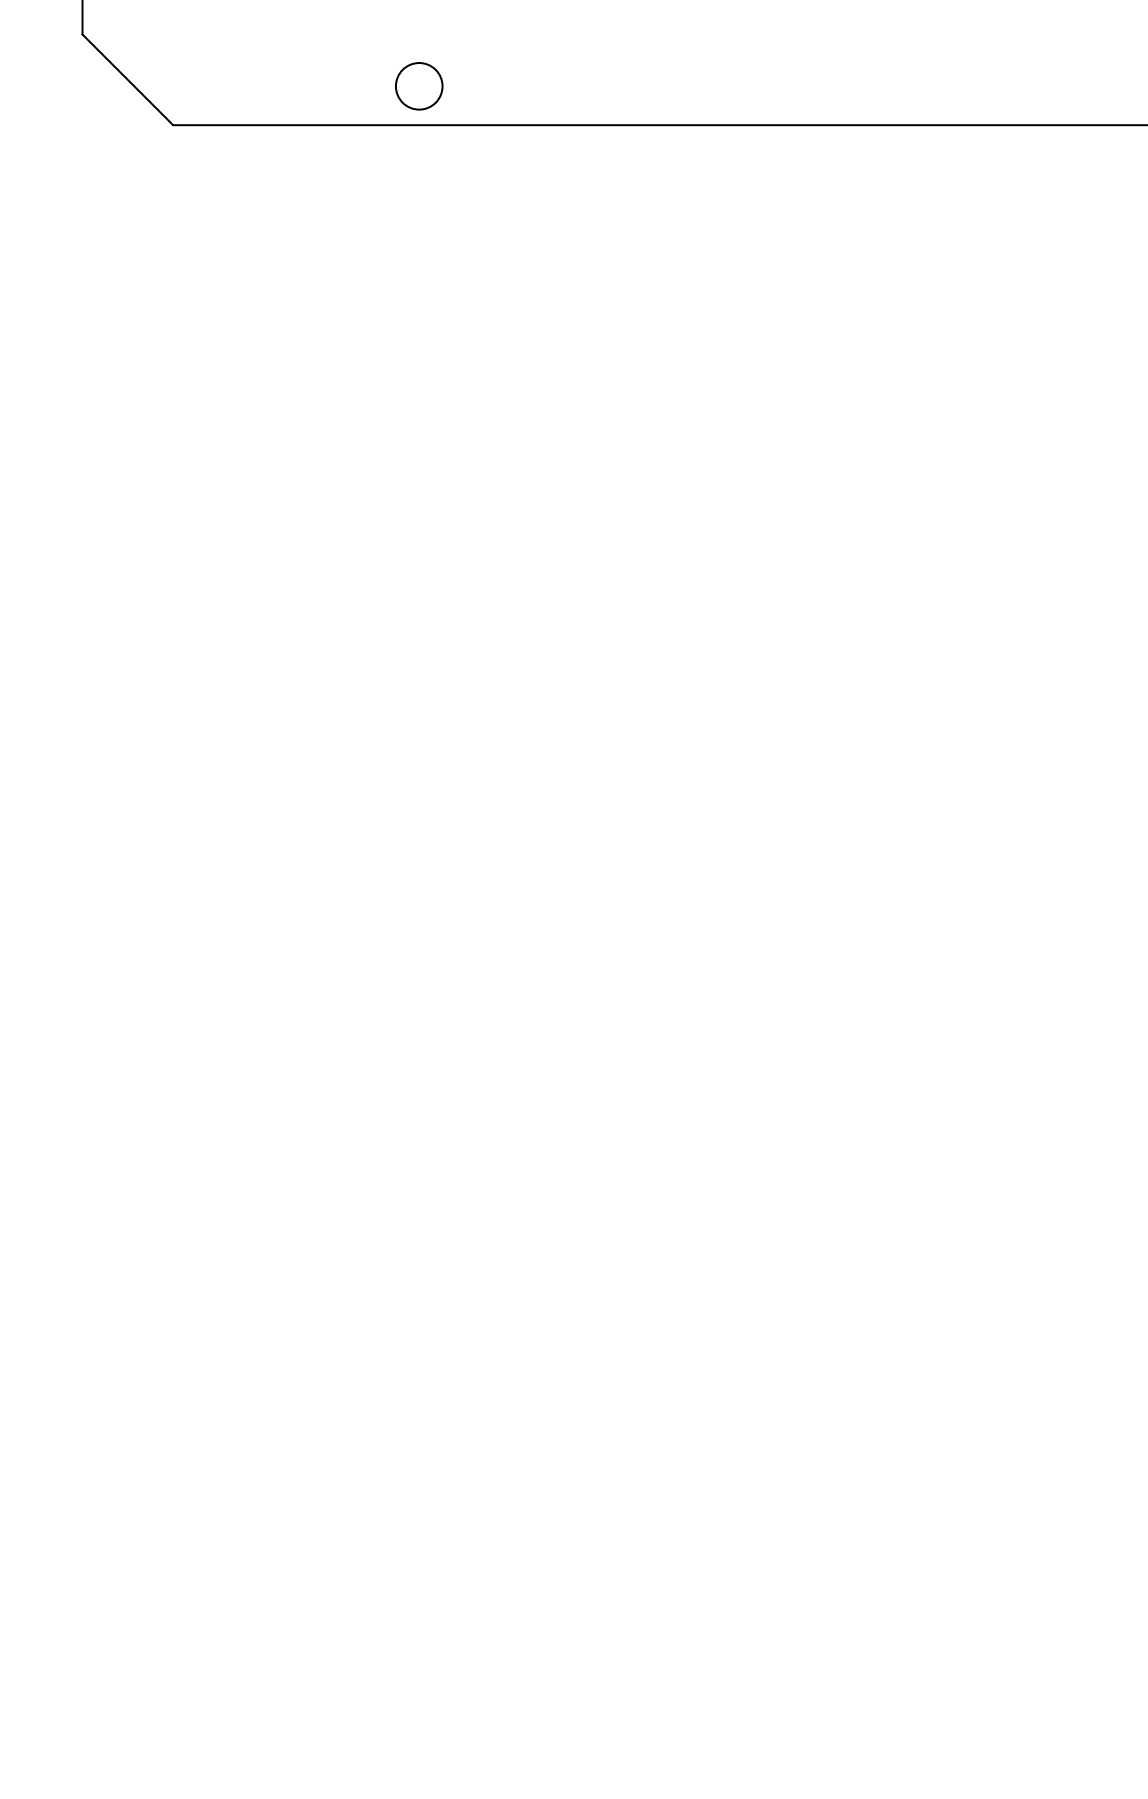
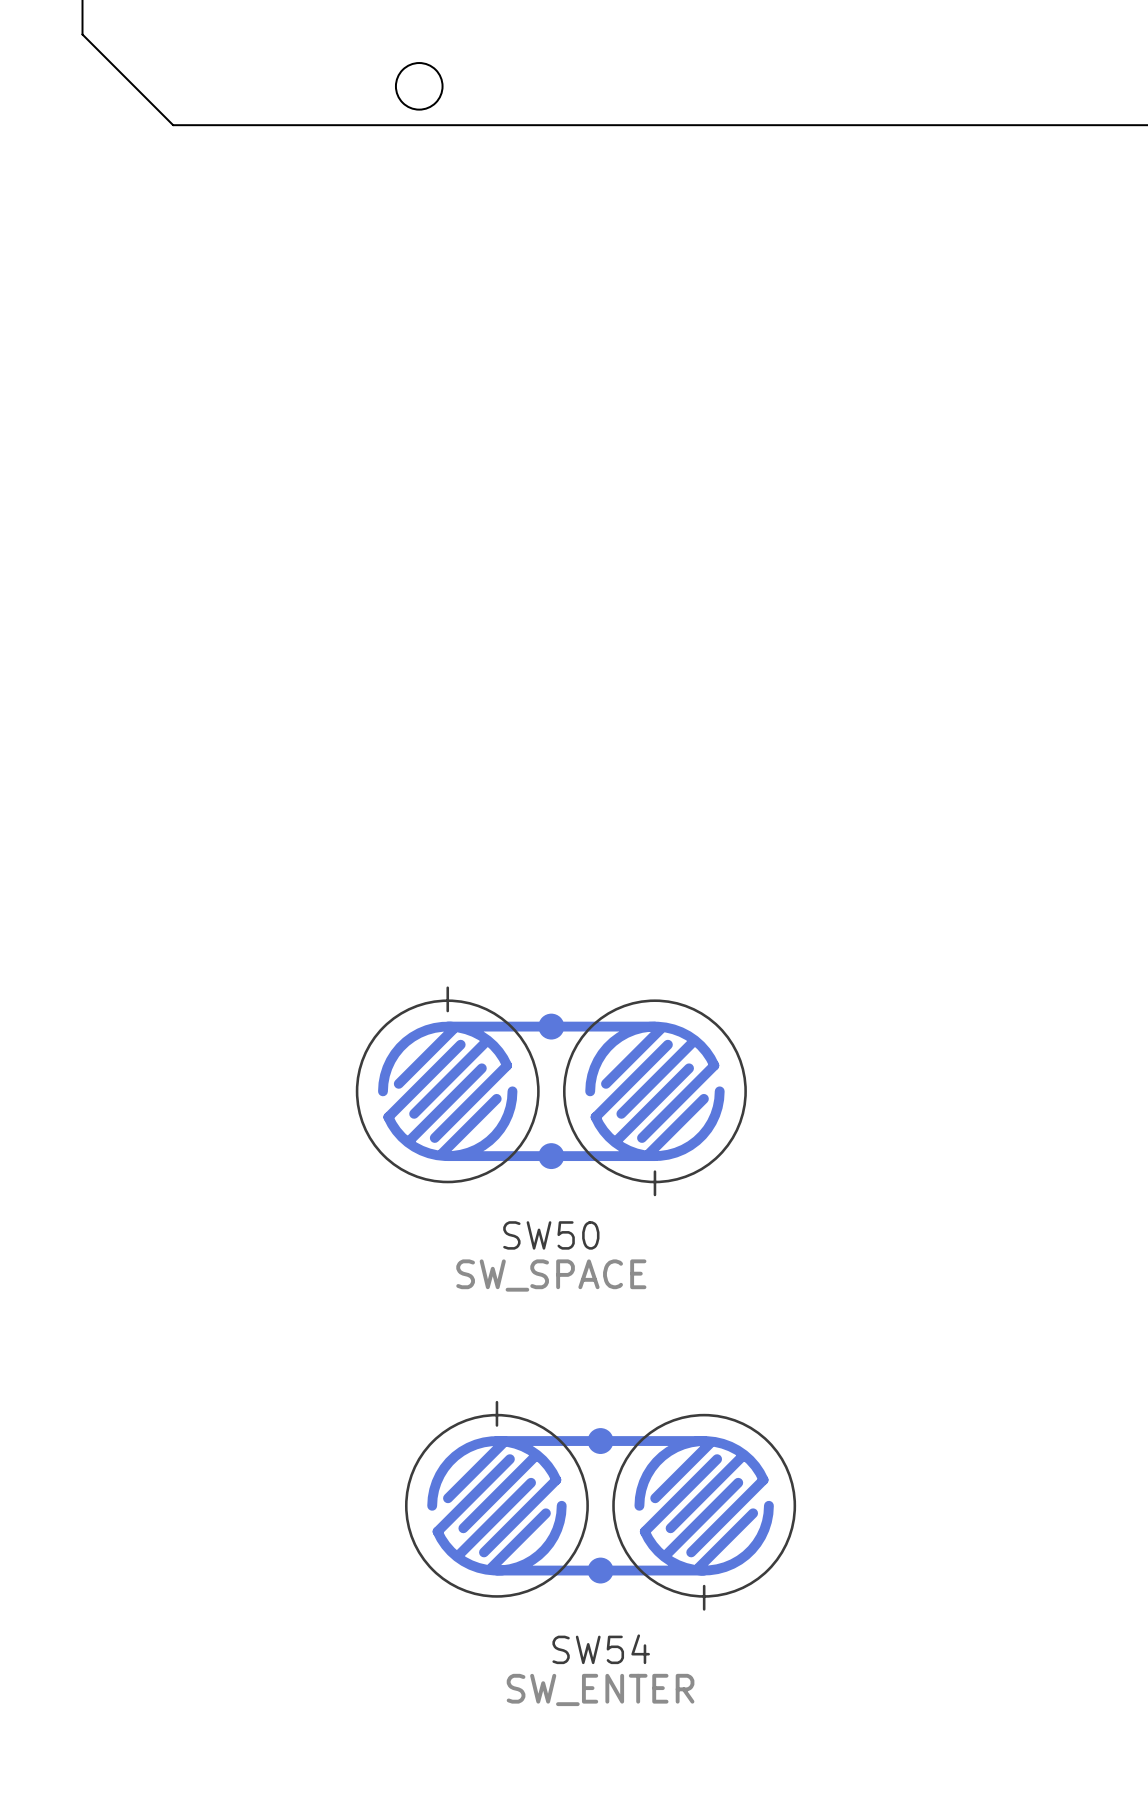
SW50: none -> SW_SPACE (551, 1091)
SW54: none -> SW_ENTER (600, 1505)

